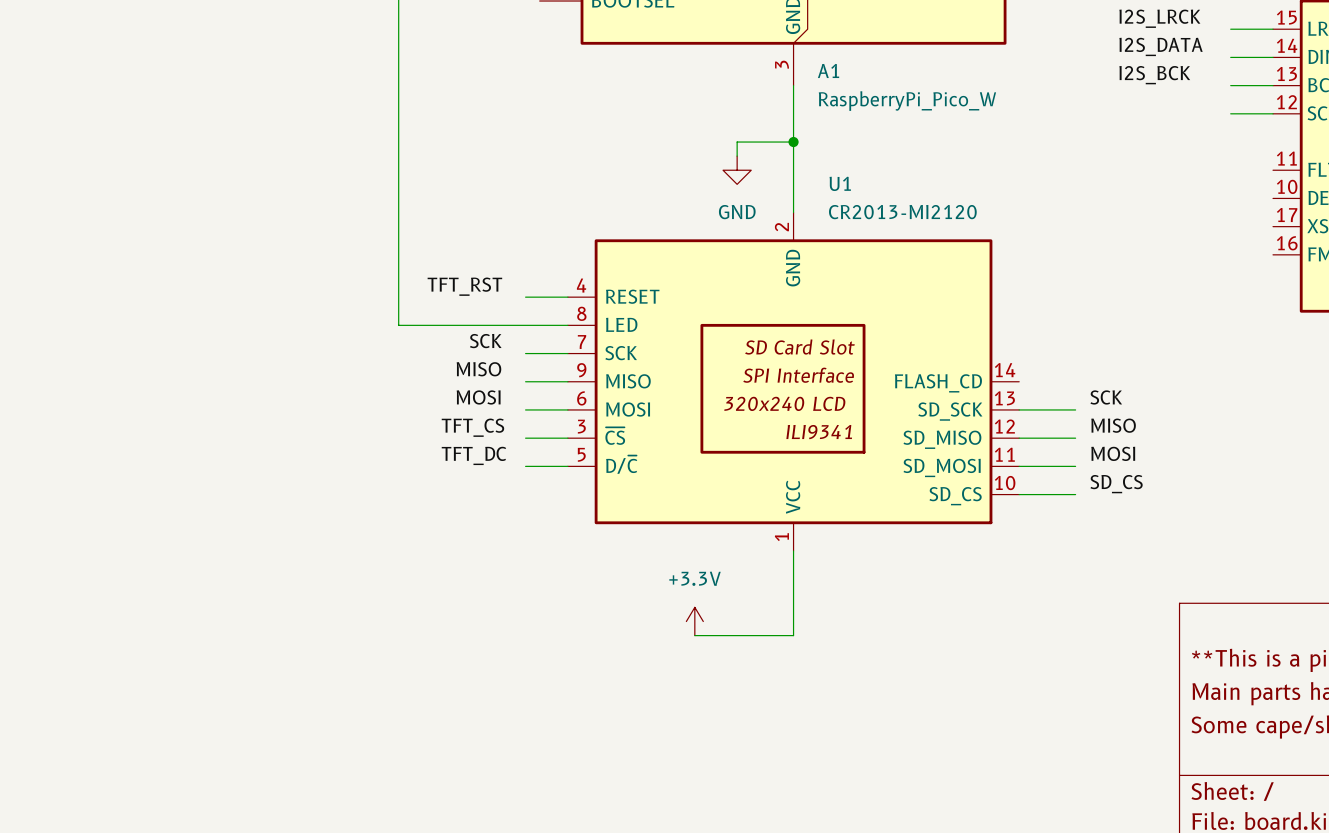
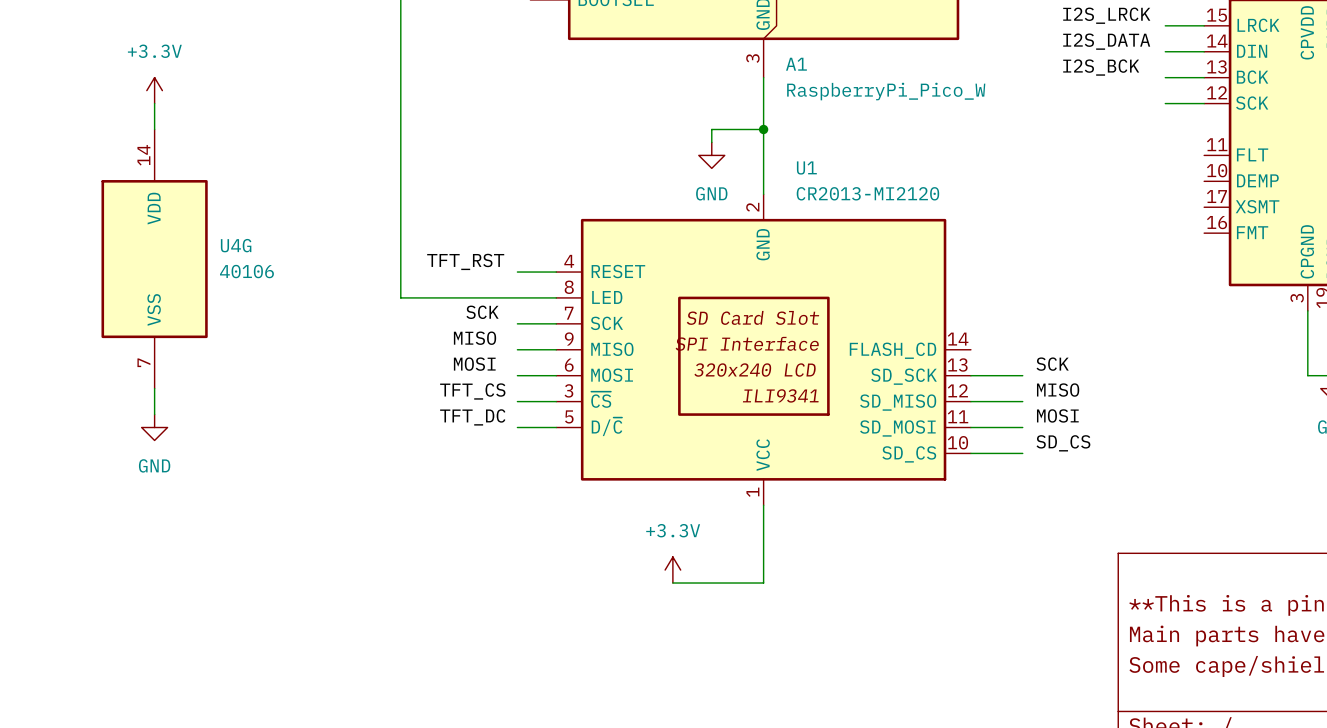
power symbol: none -> +3.3V (154, 90)
wire: none -> (154, 103) (154, 129)
U4G: none -> 40106 (154, 259)
wire: none -> (154, 388) (154, 414)
power symbol: none -> GND (154, 427)

